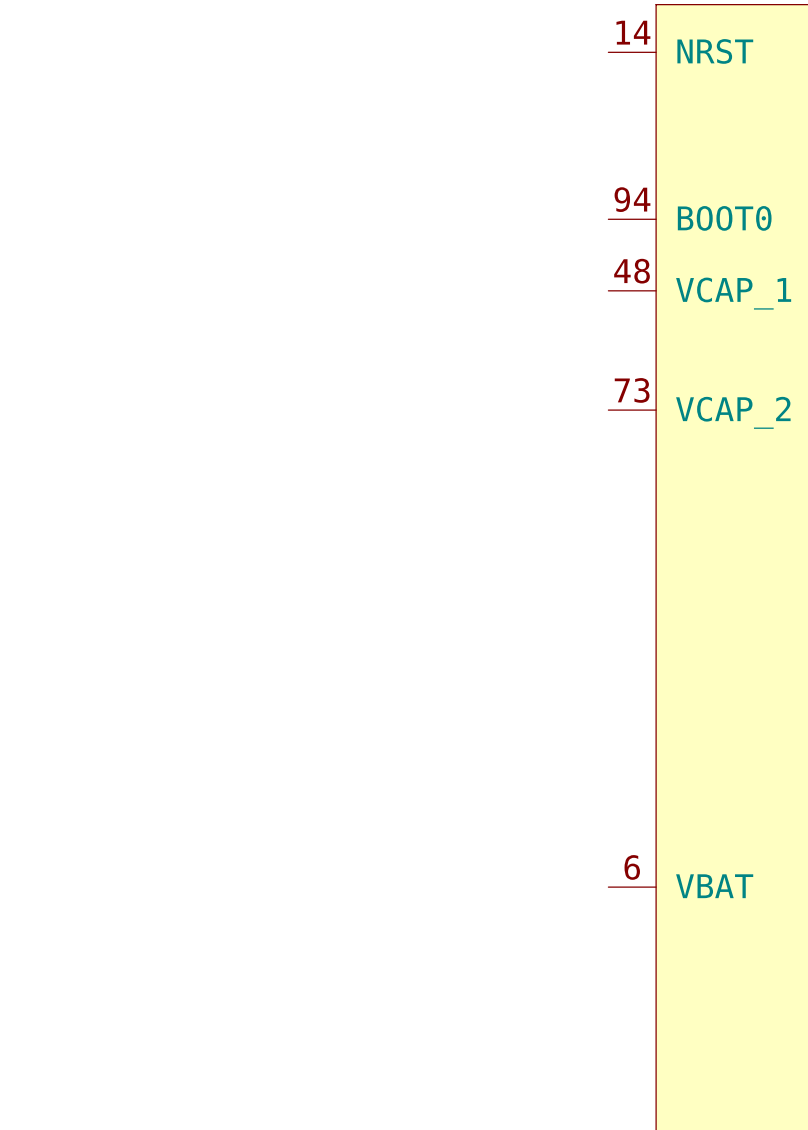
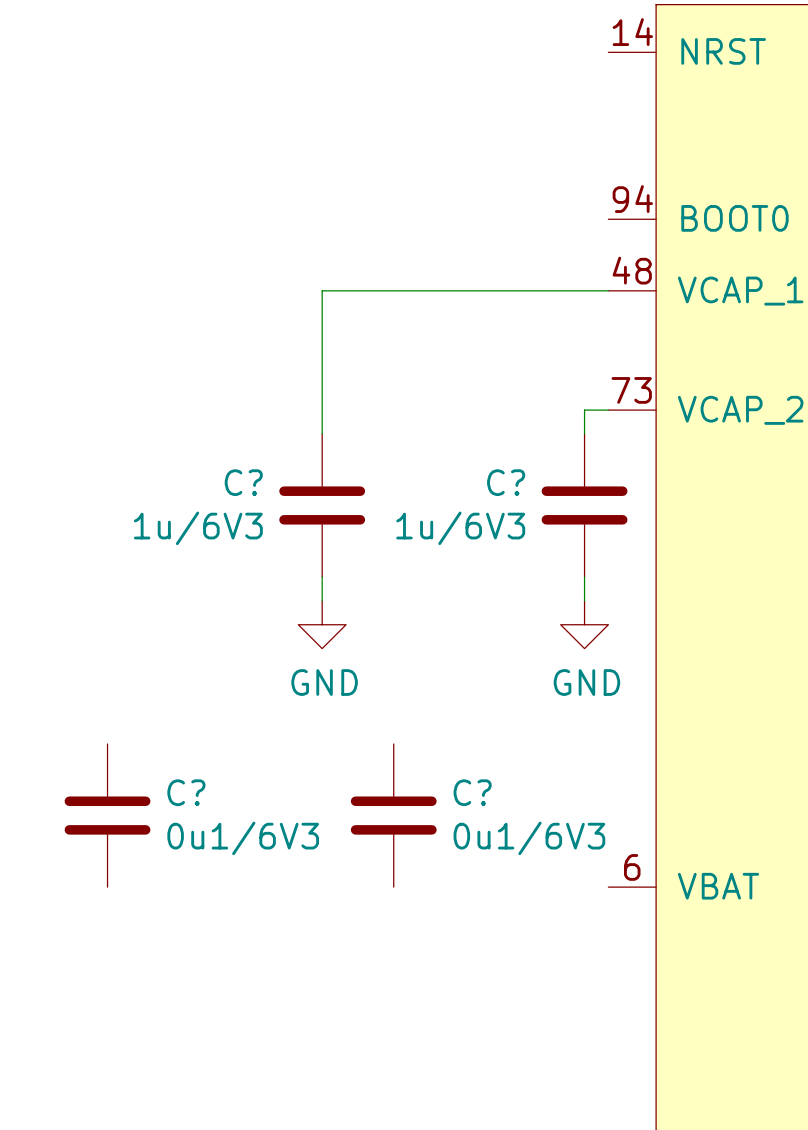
wire: none -> (608, 290) (322, 290) (322, 433)
wire: none -> (608, 410) (584, 410) (584, 433)
C?: none -> 1u/6V3 (322, 505)
C?: none -> 1u/6V3 (584, 505)
wire: none -> (322, 577) (322, 600)
wire: none -> (584, 577) (584, 600)
power symbol: none -> GND (322, 624)
power symbol: none -> GND (584, 624)
C?: none -> 0u1/6V3 (107, 815)
C?: none -> 0u1/6V3 (393, 815)

